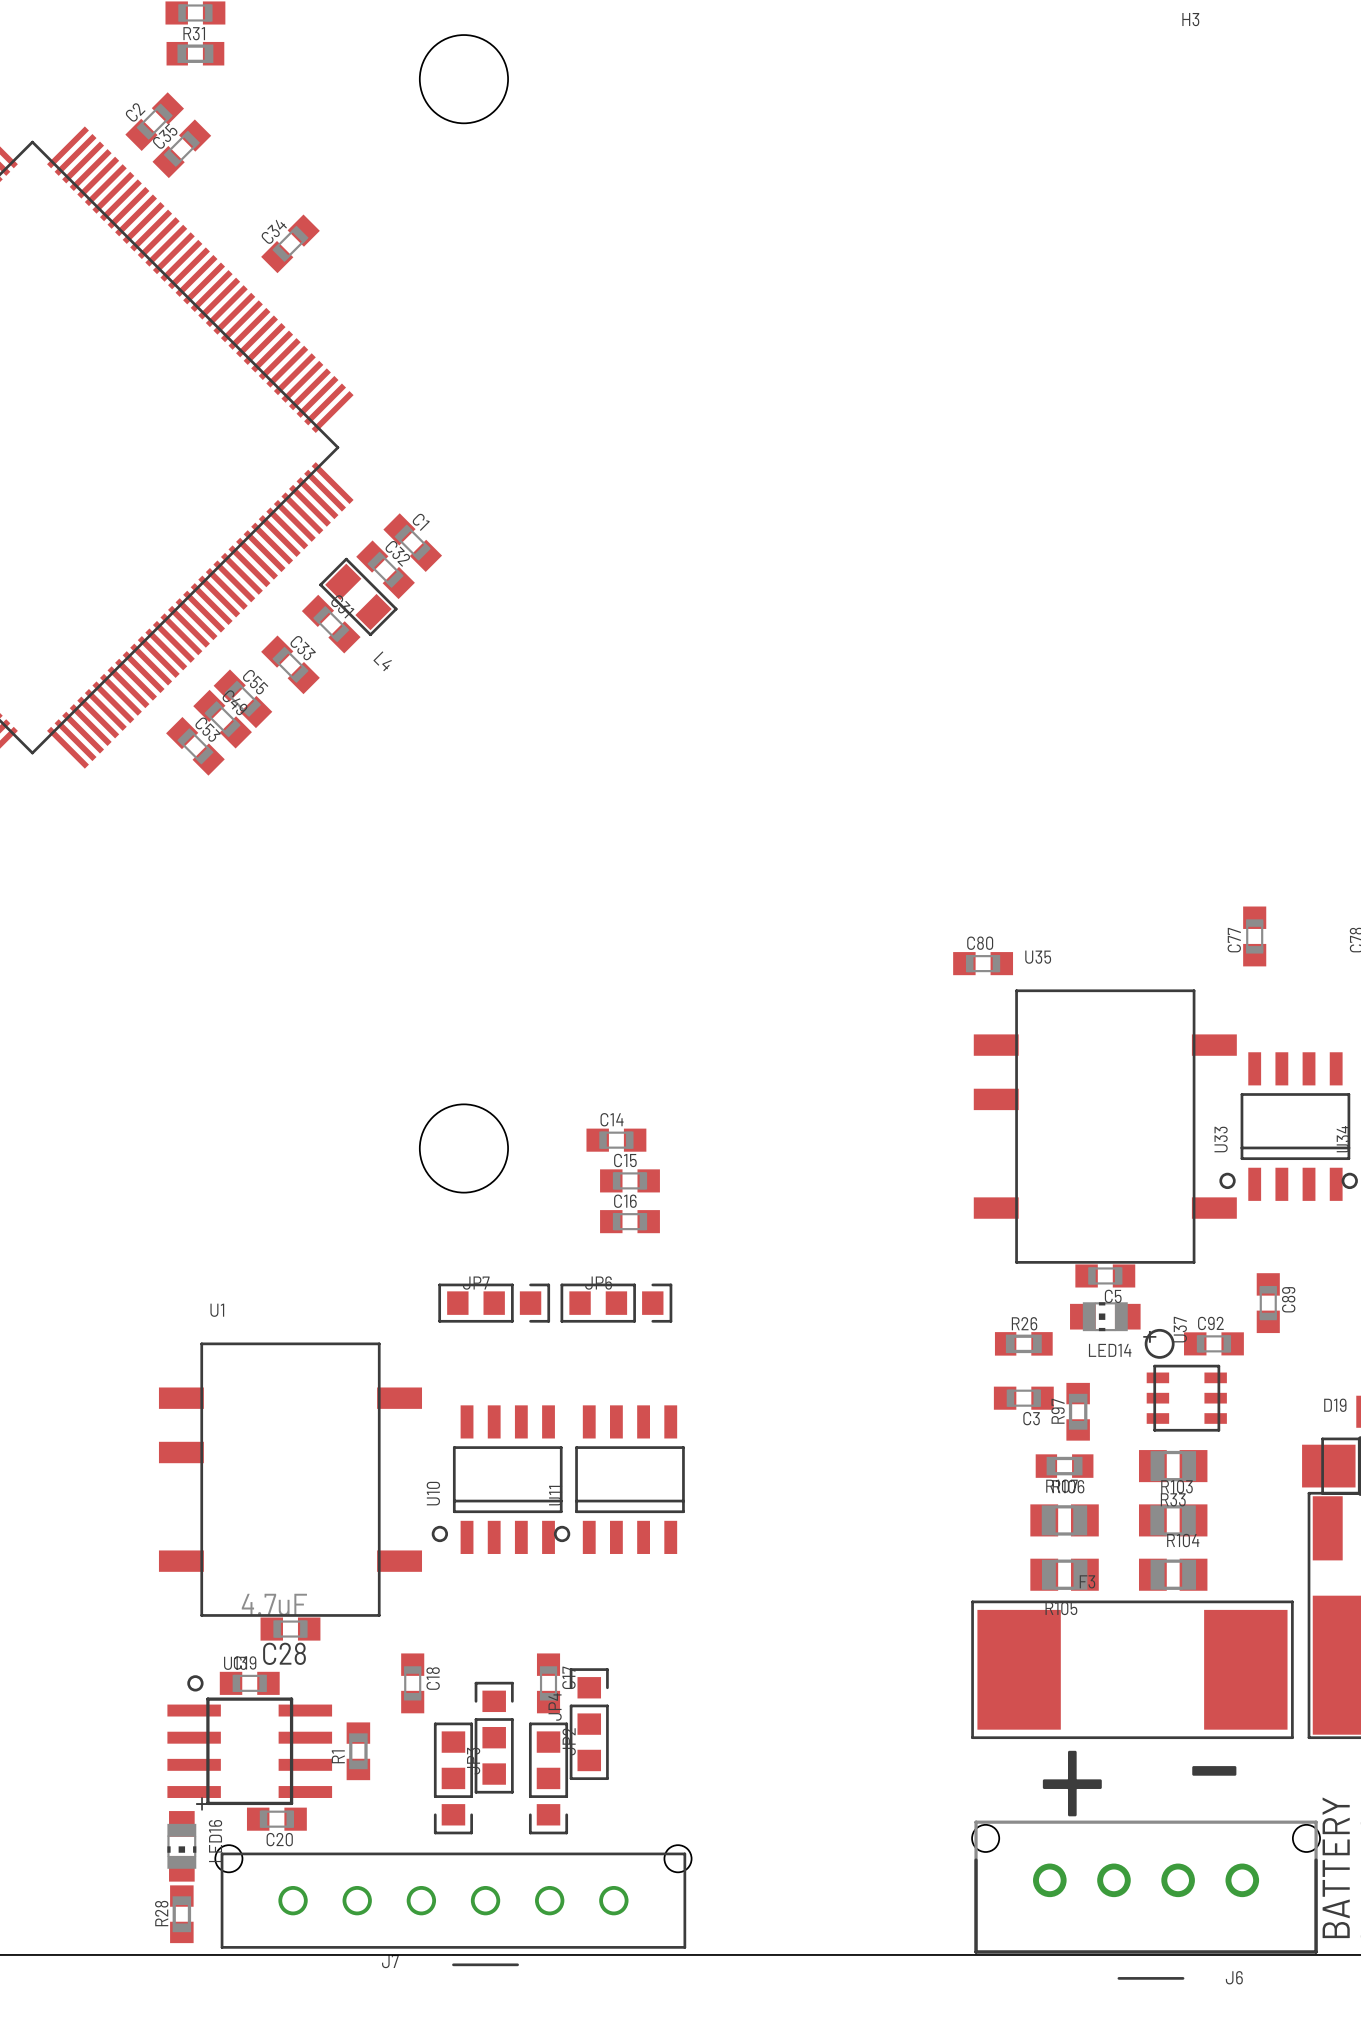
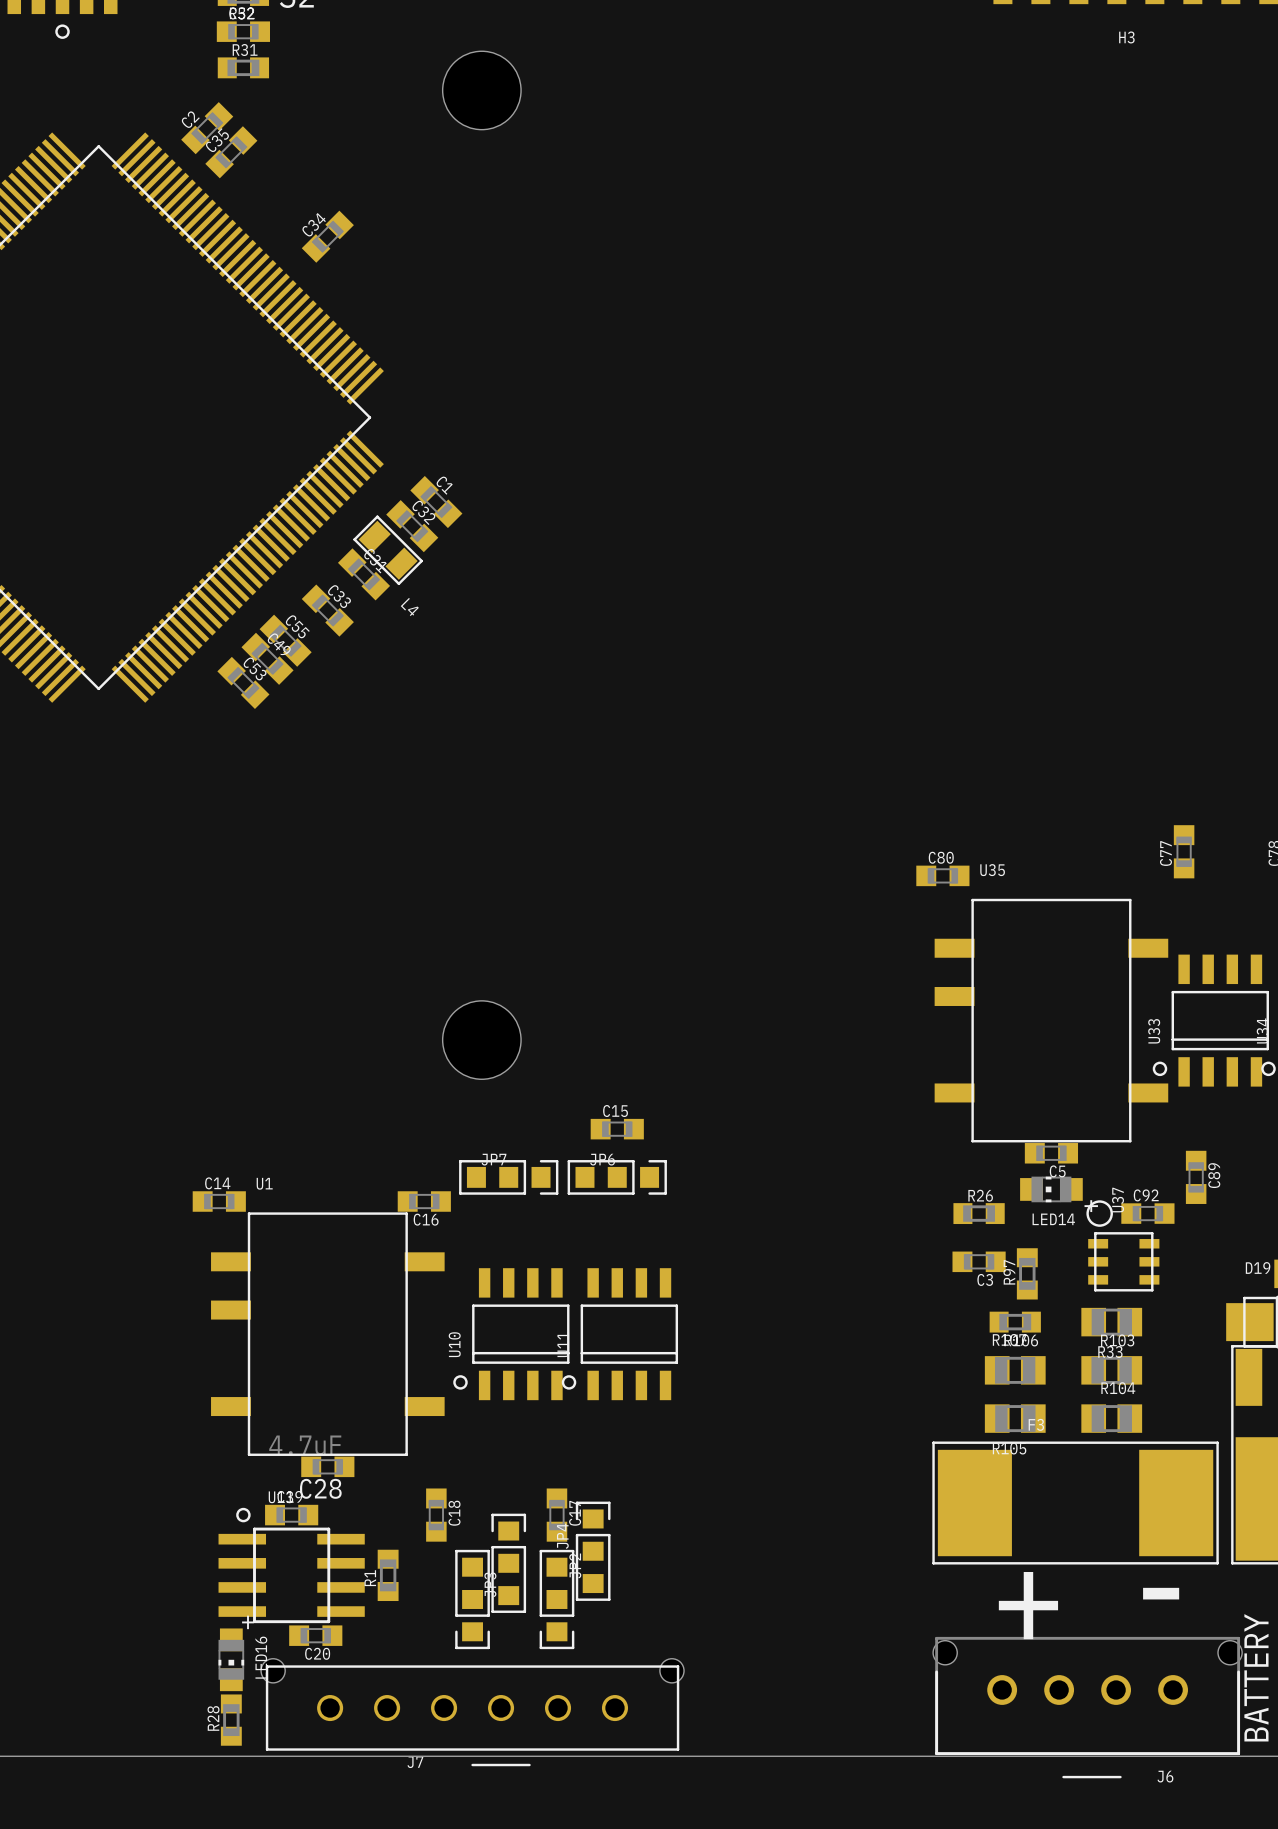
C14 position: (616, 1140) -> (219, 1201)
C15 position: (629, 1180) -> (617, 1129)
C16 name position: C16 (625, 1201) -> C16 (426, 1219)
C16 position: (629, 1221) -> (424, 1201)

